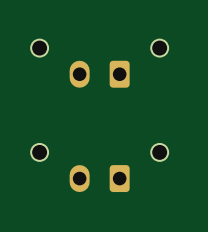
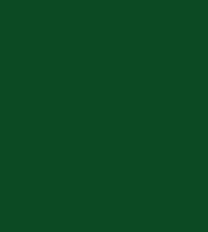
part: (99, 63) -> none
part: (99, 167) -> none

